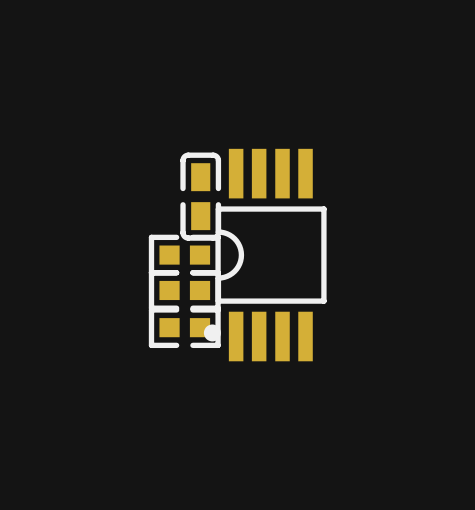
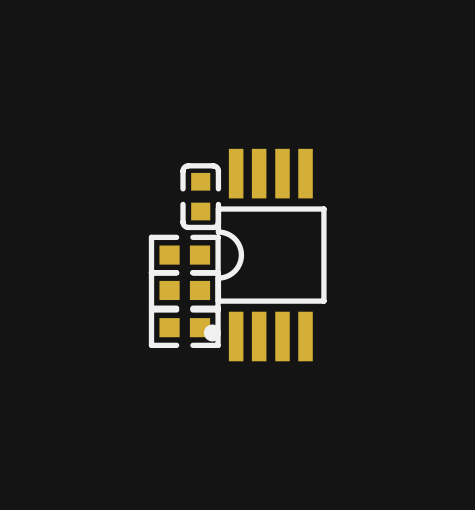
part footprint: [180, 152, 222, 241] -> [180, 163, 222, 231]

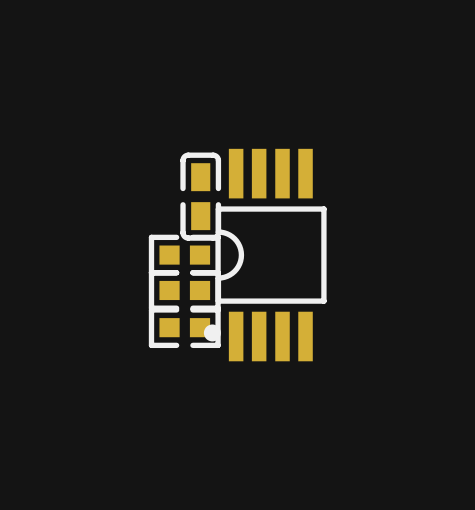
part footprint: [180, 163, 222, 231] -> [180, 152, 222, 241]

